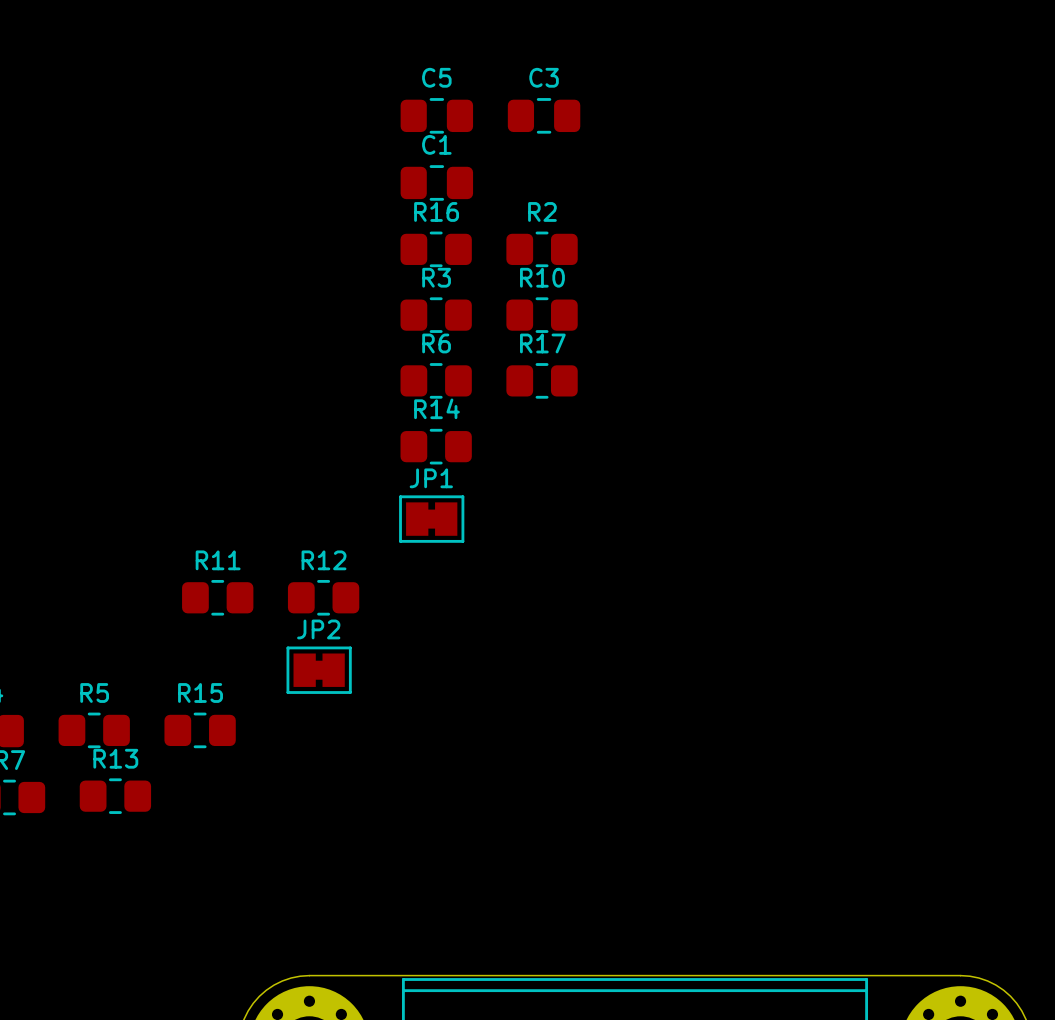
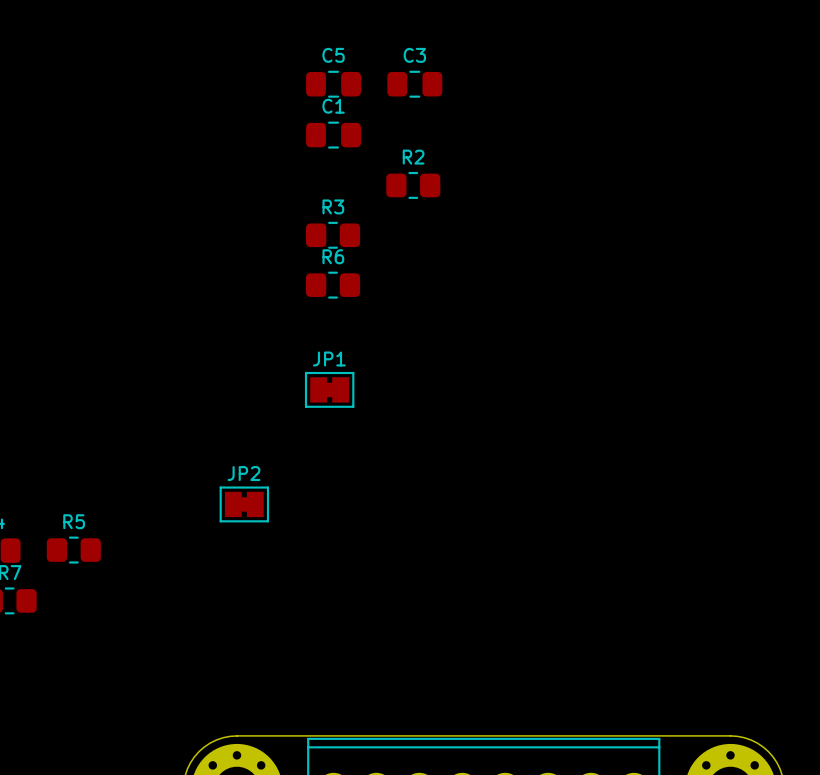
R16: (436, 249) -> none
R10: (542, 315) -> none
R17: (542, 380) -> none
R14: (436, 446) -> none
R11: (217, 597) -> none
R12: (323, 597) -> none
R15: (200, 730) -> none
R13: (115, 796) -> none

